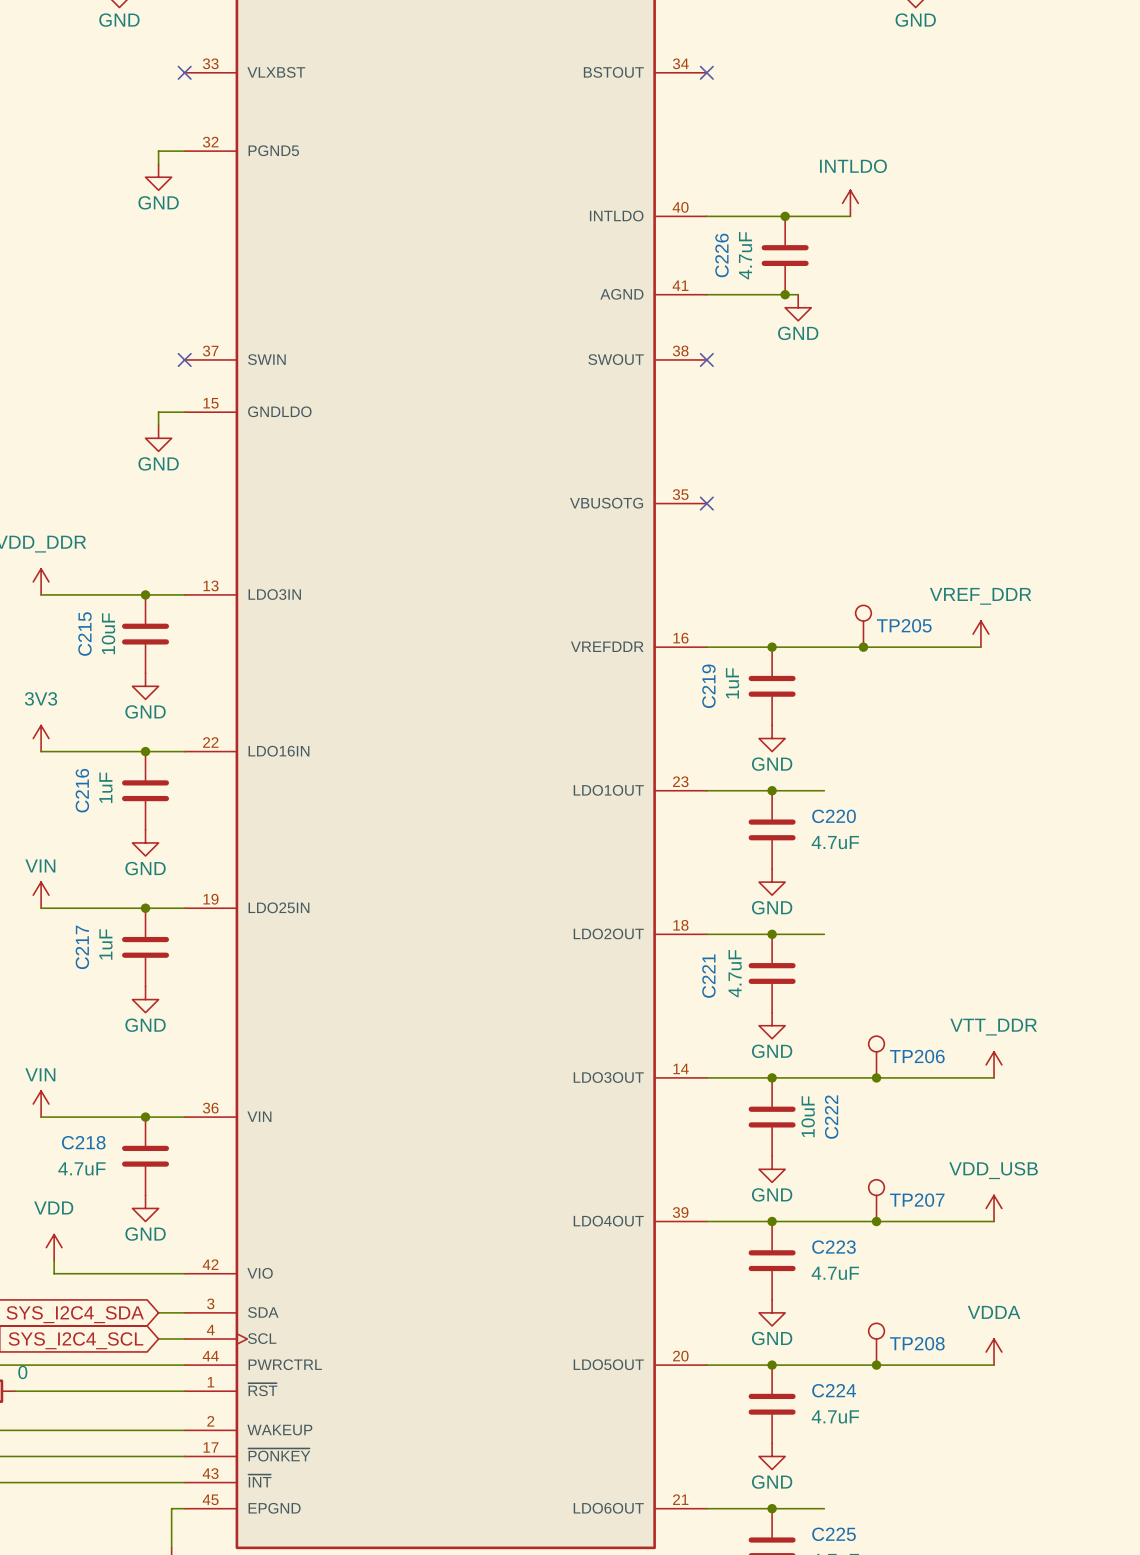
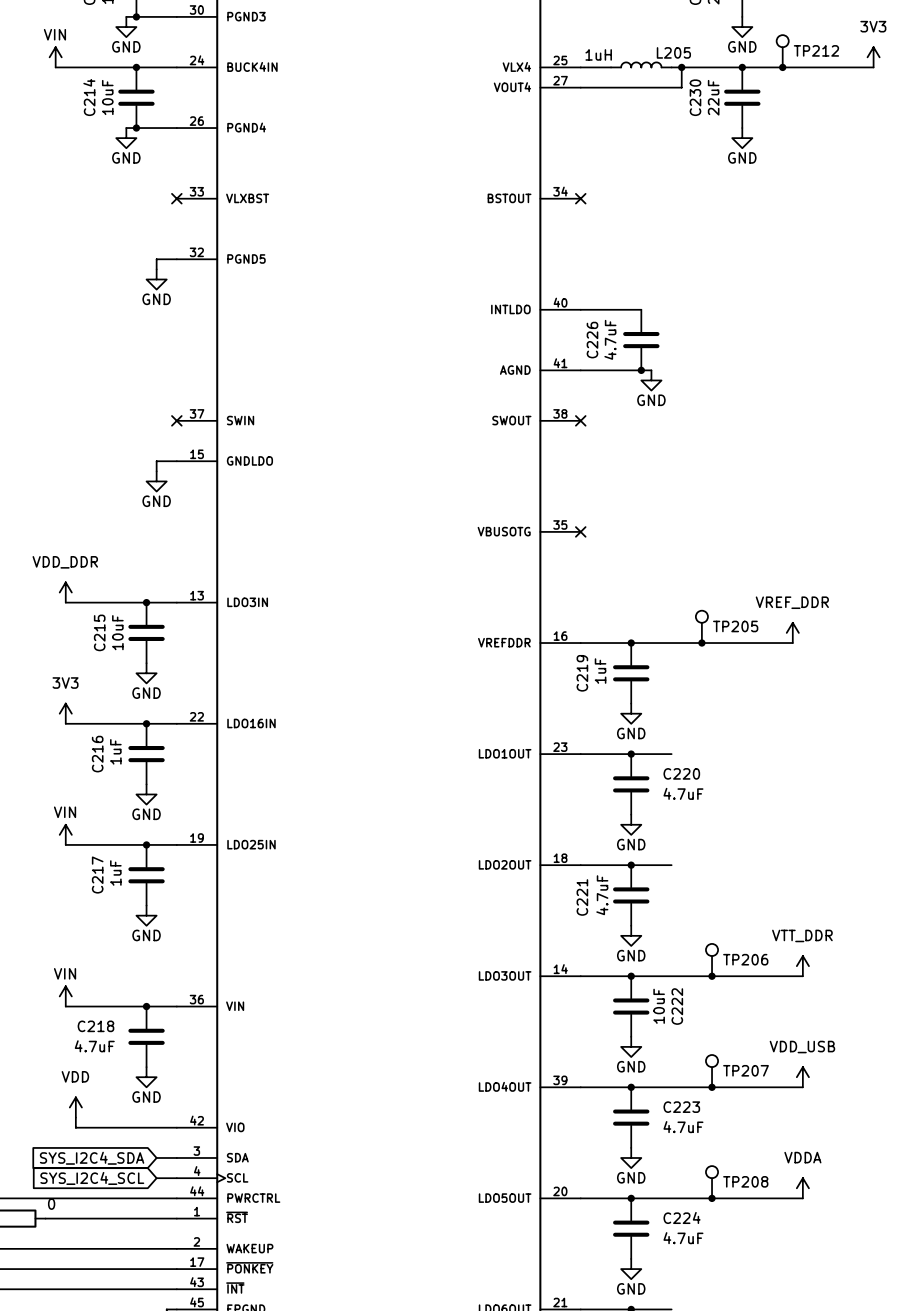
power symbol: INTLDO (850, 203) -> none
wire: (785, 216) (850, 216) -> none
junction: (785, 216) -> none

